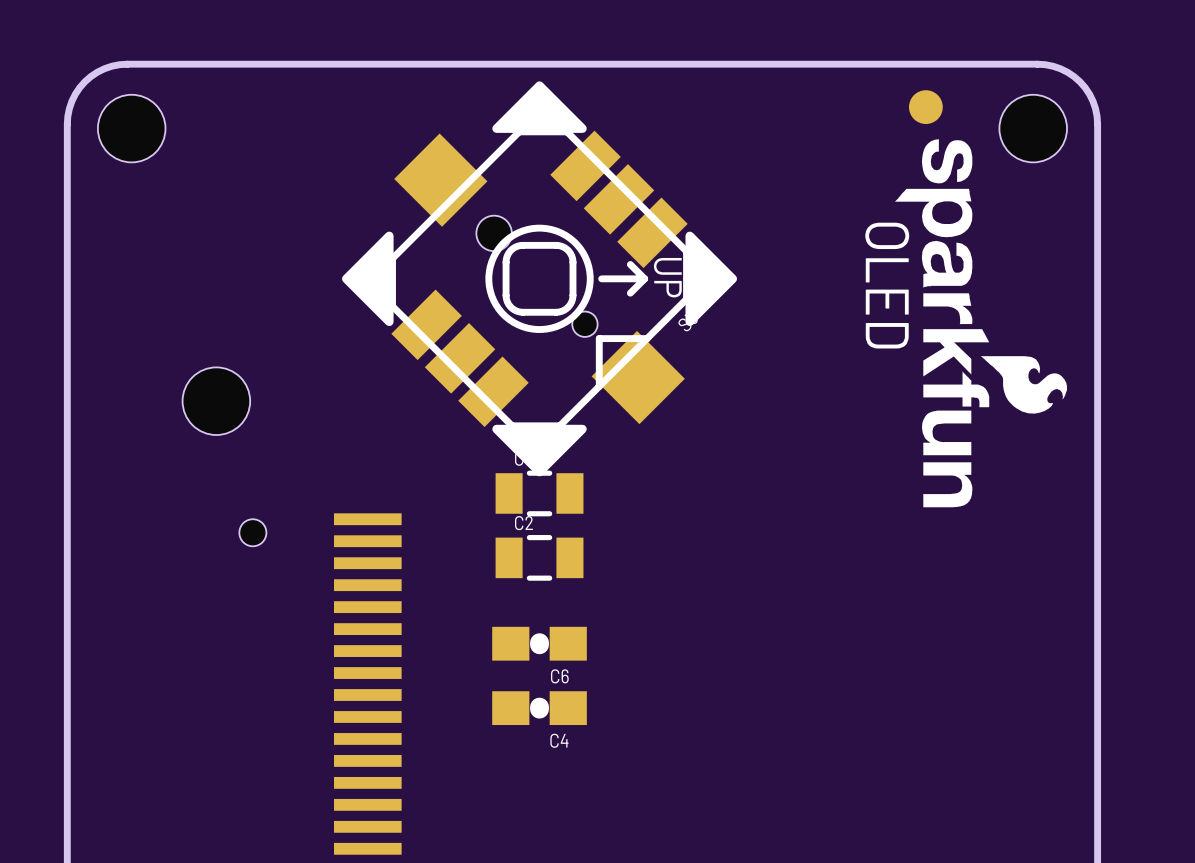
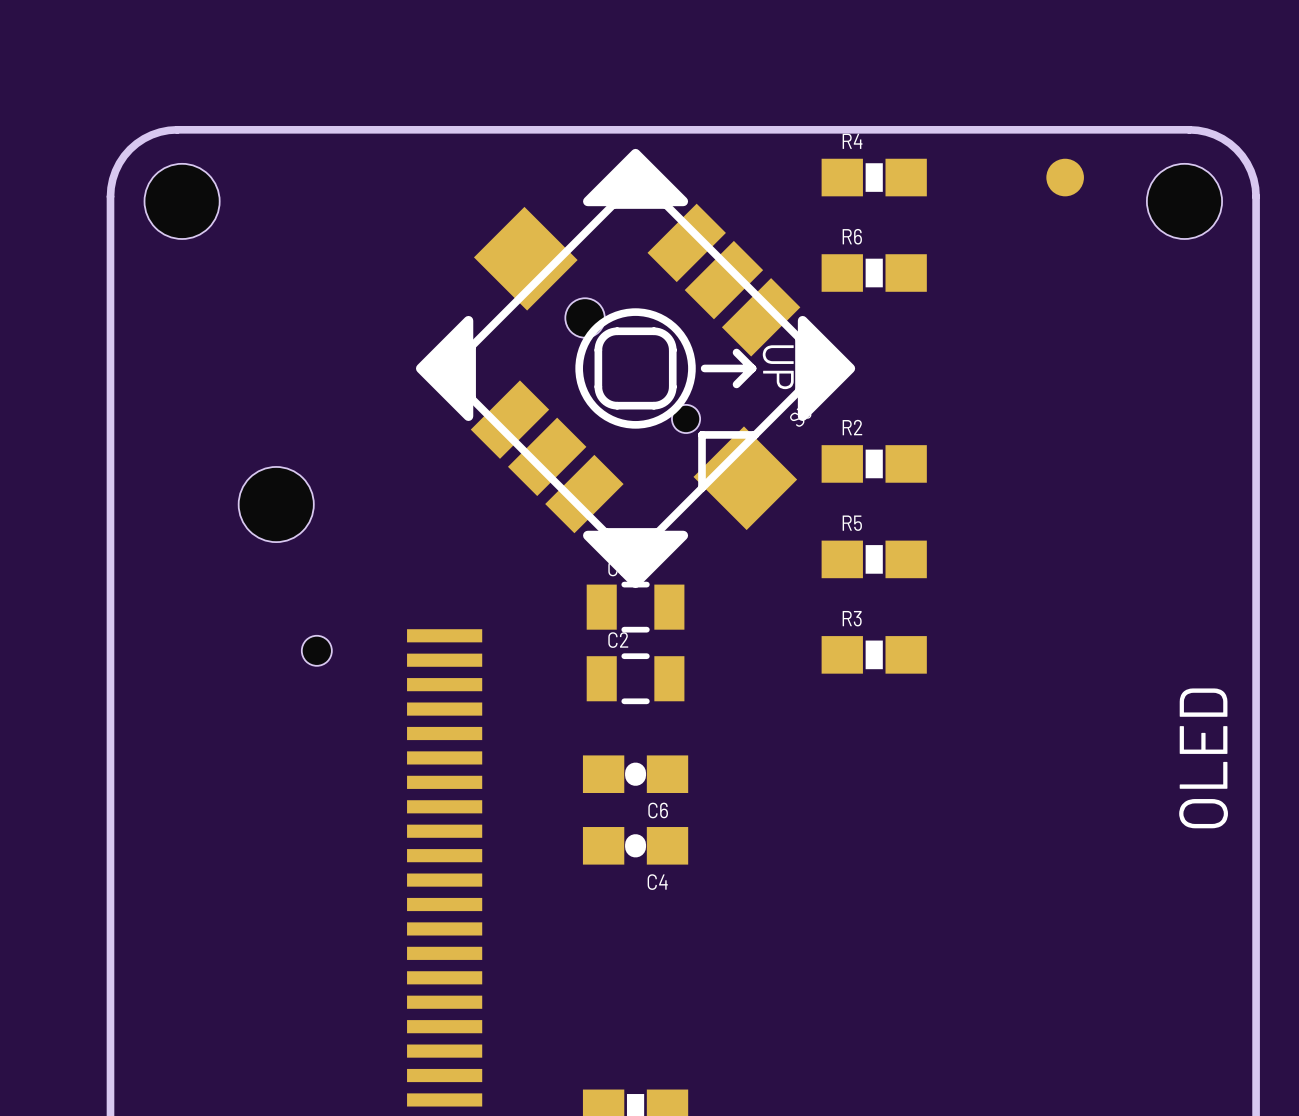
R4: none -> (874, 177)
drawing: [894, 139, 1067, 508] -> none
R6: none -> (874, 273)
text rotation: 0° (887, 285) -> 180° (1203, 758)
text position: OLED (887, 285) -> OLED (1203, 758)
R2: none -> (874, 463)
R5: none -> (874, 559)
R3: none -> (874, 654)

